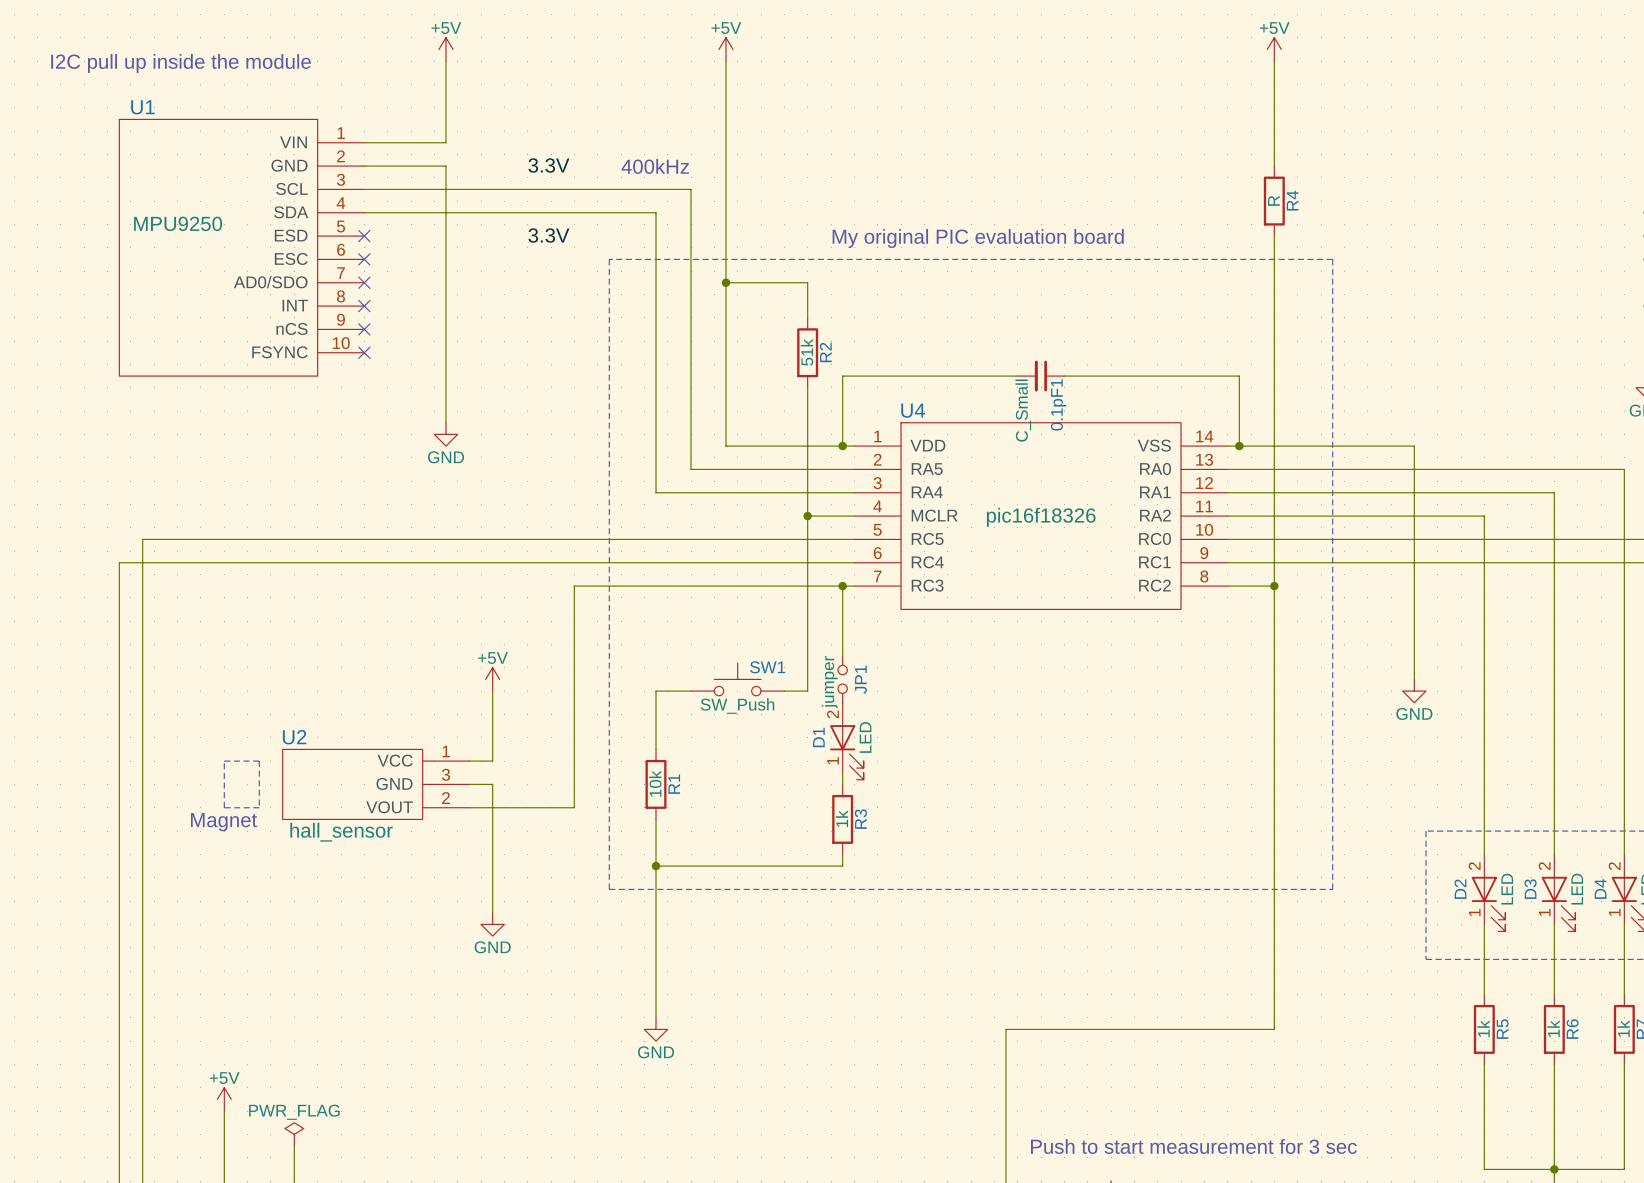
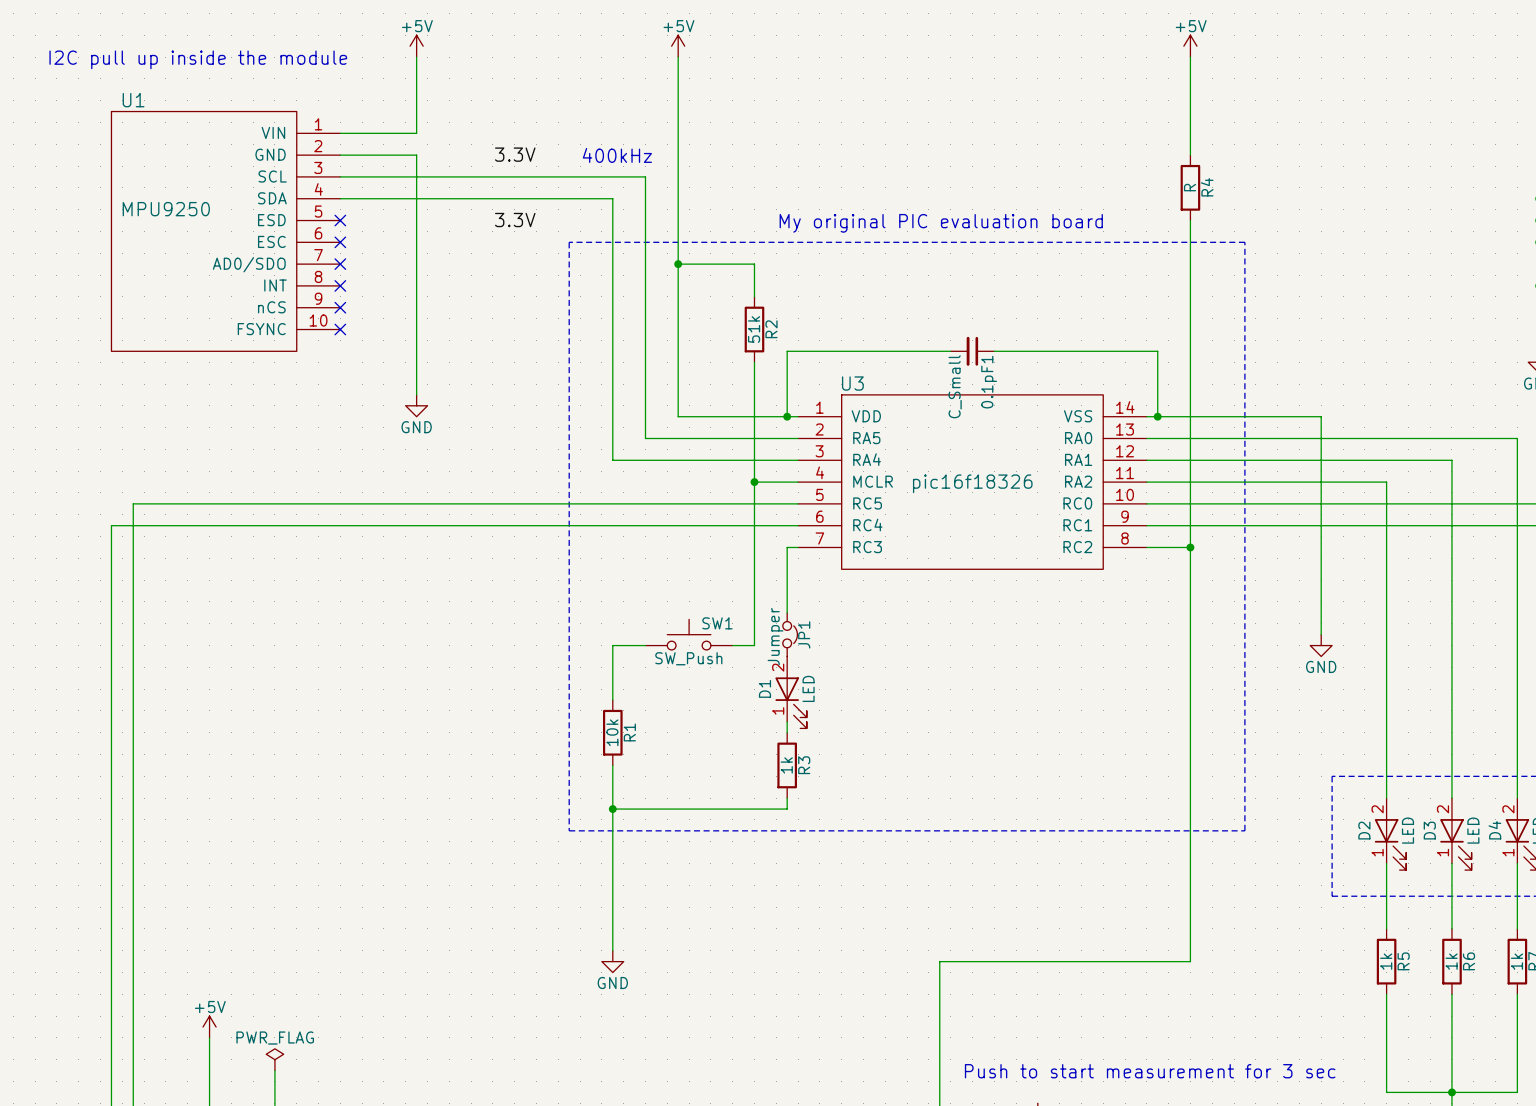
U4 name: U4 (913, 410) -> U3 (852, 383)
wire: (842, 586) (574, 586) (574, 807) (469, 807) -> none
junction: (842, 586) -> none
JP1 symbol: [838, 656, 848, 703] -> [782, 612, 798, 657]
power symbol: +5V (492, 679) -> none
JP1 value: jumper (829, 682) -> Jumper (775, 636)
wire: (492, 691) (492, 761) (469, 761) -> none
line: (224, 761) (224, 807) (259, 807) (259, 761) (224, 761) -> none
U2: hall_sensor (376, 784) -> none
wire: (469, 784) (492, 784) (492, 912) -> none
text: Magnet (224, 822) -> none
power symbol: GND (492, 924) -> none

